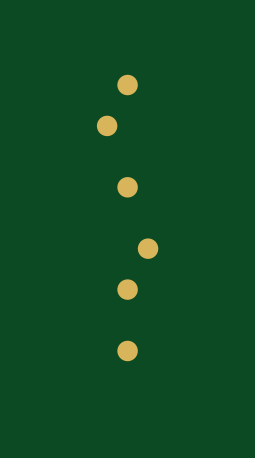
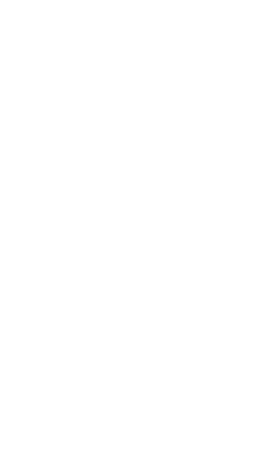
part: (127, 85) -> none
part: (107, 125) -> none
part: (127, 187) -> none
part: (148, 248) -> none
part: (127, 289) -> none
part: (127, 350) -> none

